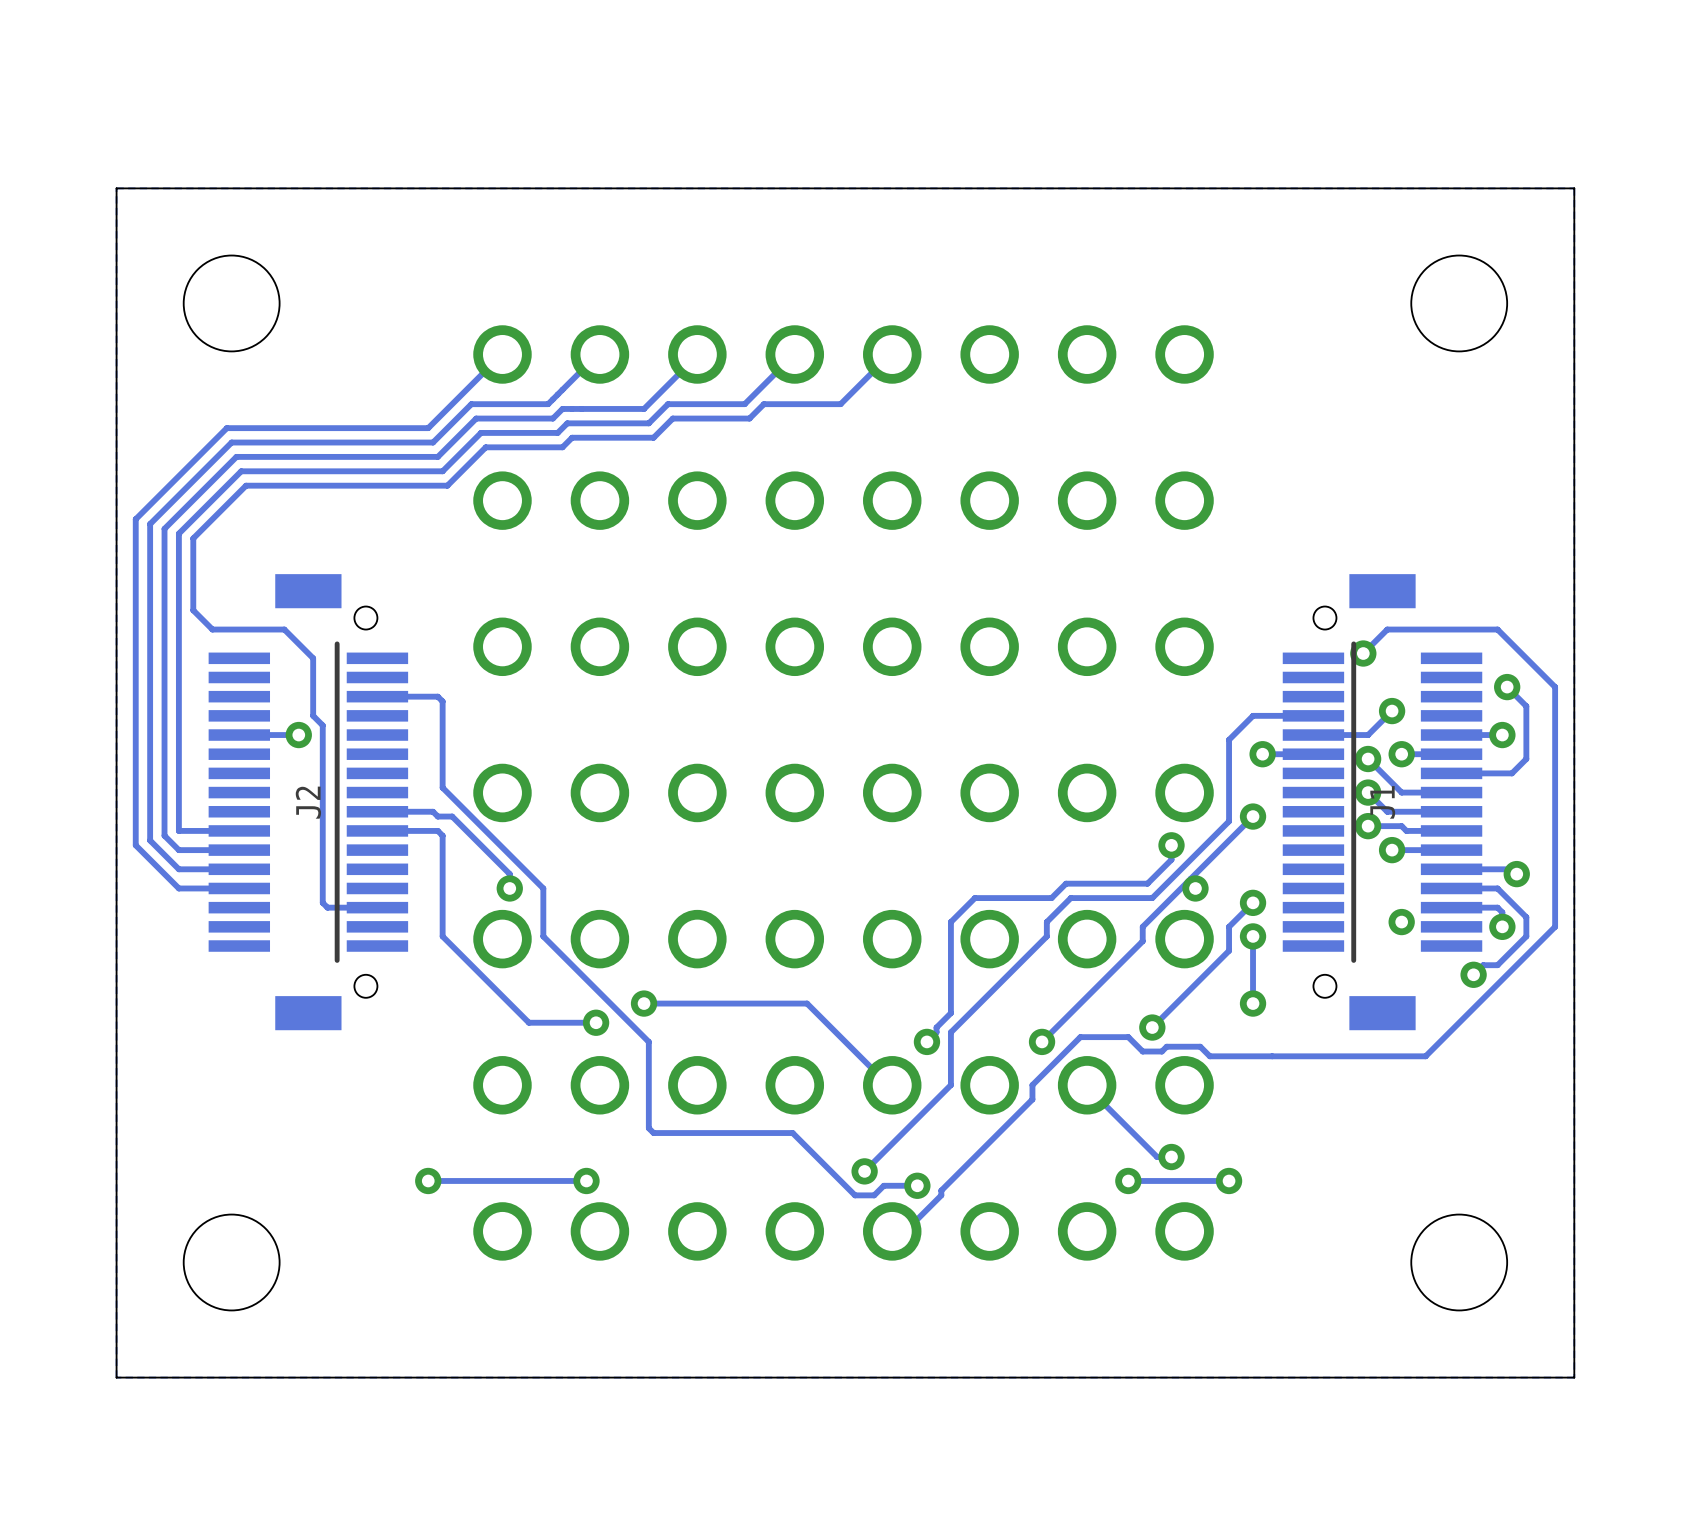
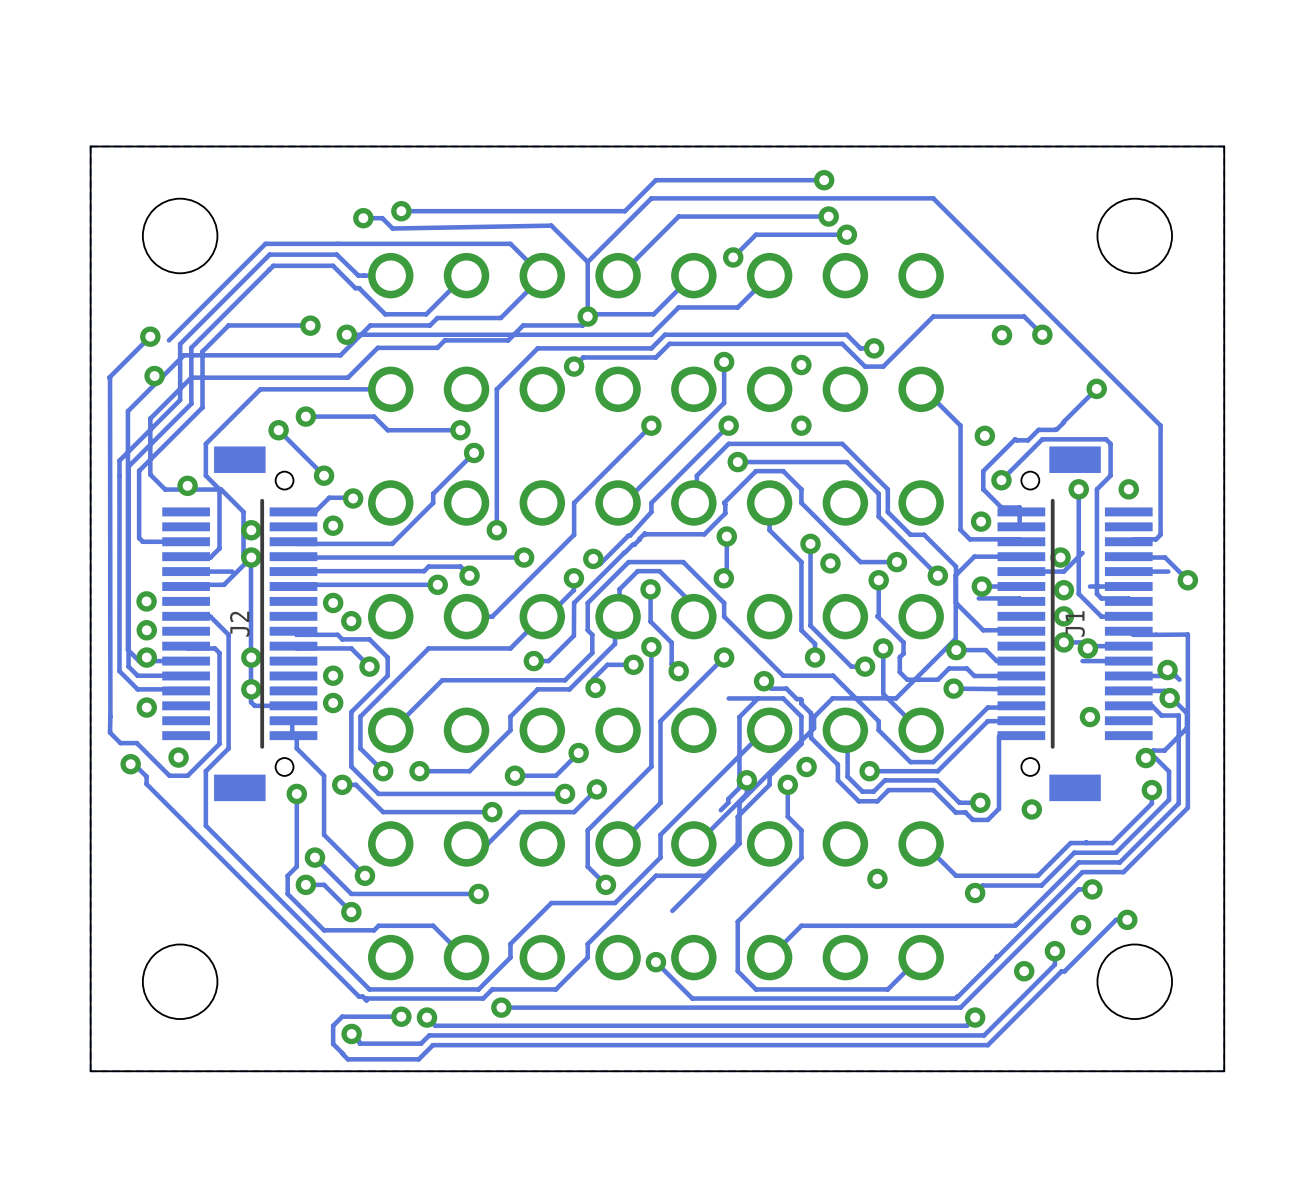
track: none -> (824, 180) (655, 180) (624, 211) (401, 211)
via: none -> (824, 180)
via: none -> (401, 211)
track: none -> (828, 216) (678, 216) (618, 275)
via: none -> (828, 216)
track: none -> (363, 218) (382, 218) (392, 228) (551, 225) (587, 262)
via: none -> (363, 218)
track: none -> (846, 234) (755, 234) (733, 257)
via: none -> (846, 234)
via: none -> (733, 257)
track: none -> (587, 262) (587, 316)
track: none -> (587, 262) (651, 198) (933, 198) (1160, 425) (1160, 534) (1156, 539) (1133, 539) (1128, 541)
track: (502, 354) (428, 428) (226, 428) -> (542, 275) (510, 243) (265, 243) (176, 332)
track: (794, 354) (744, 404) (668, 404) (648, 423) (567, 423) (557, 432) (481, 432) (442, 471) (241, 471) (178, 533) (178, 605) -> (310, 325) (228, 325) (202, 351) (202, 407) (139, 470)
track: none -> (769, 275) (737, 307) (678, 307) (651, 334) (346, 334)
track: (495, 404) (471, 404) (433, 442) (231, 442) (150, 524) (150, 840) (178, 869) (239, 869) -> (385, 314) (333, 265) (273, 265) (191, 347) (191, 403) (128, 466) (128, 666) (137, 675) (186, 675)
via: none -> (587, 316)
via: none -> (310, 325)
via: none -> (346, 334)
track: none -> (1042, 334) (1024, 316) (933, 316) (883, 366) (865, 366) (842, 343) (669, 343) (655, 357) (583, 357) (574, 366)
via: none -> (1042, 334)
via: none -> (1001, 335)
track: none -> (150, 336) (109, 377) (110, 732) (120, 743) (136, 743) (169, 775) (187, 775) (219, 743) (219, 653) (214, 648) (187, 648) (186, 646)
via: none -> (150, 336)
track: (217, 437) (135, 519) (135, 845) (178, 888) (239, 888) -> (390, 275) (358, 275) (336, 254) (269, 254) (180, 344) (180, 400) (119, 460) (119, 671) (137, 689) (186, 690)
track: none -> (874, 348) (860, 348) (846, 334) (665, 334) (651, 348) (537, 348) (496, 389) (496, 530)
via: none -> (874, 348)
track: none -> (724, 362) (724, 402) (624, 502) (618, 502)
via: none -> (724, 362)
via: none -> (801, 365)
via: none -> (574, 366)
via: none -> (154, 376)
track: none -> (390, 389) (260, 389) (205, 443) (205, 475) (219, 489) (219, 548) (210, 557) (186, 556)
track: none -> (921, 389) (924, 389) (960, 425) (960, 529) (970, 539) (1019, 539) (1021, 541)
track: none -> (1096, 388) (1057, 429) (1038, 429) (1028, 440) (1015, 439) (983, 471) (983, 489) (1001, 507) (1019, 507) (1021, 511) (1019, 512) (1019, 525) (1021, 526)
via: none -> (1096, 388)
track: none -> (305, 416) (374, 416) (387, 430) (460, 430)
via: none -> (305, 416)
track: none -> (651, 425) (574, 502) (574, 534) (492, 616) (466, 616)
via: none -> (651, 425)
track: none -> (728, 425) (651, 502) (651, 512) (630, 535) (600, 564) (589, 564) (593, 558)
via: none -> (728, 425)
via: none -> (801, 425)
track: none -> (278, 430) (324, 475)
via: none -> (278, 430)
via: none -> (460, 430)
via: none -> (984, 435)
via: none -> (474, 452)
track: none -> (737, 462) (846, 462) (878, 493) (878, 516) (937, 575)
via: none -> (737, 462)
via: none -> (324, 475)
via: none -> (1001, 480)
via: none -> (187, 485)
via: none -> (1128, 489)
track: none -> (353, 498) (329, 497) (315, 511) (293, 511)
via: none -> (353, 498)
track: none -> (693, 502) (696, 502) (696, 475) (728, 443) (842, 443) (887, 489) (887, 512) (910, 534) (924, 534) (956, 566) (956, 602) (983, 630) (1021, 631)
track: none -> (769, 502) (769, 530) (801, 562) (801, 630) (815, 643) (815, 657)
track: (1363, 653) (1387, 629) (1497, 629) (1555, 687) (1555, 926) (1425, 1056) (1209, 1056) (1200, 1046) (1166, 1046) (1161, 1051) (1142, 1051) (1128, 1037) (1080, 1037) (1032, 1085) (1032, 1099) (941, 1190) (941, 1195) (907, 1228) (893, 1228) (892, 1231) -> none
via position: (1363, 653) -> (1078, 489)
via: none -> (981, 521)
via: none -> (333, 525)
via: none -> (251, 530)
via: none -> (496, 530)
track: (1507, 687) (1526, 706) (1526, 759) (1511, 773) (1451, 773) -> (1001, 480) (1042, 439) (1106, 439) (1110, 443) (1110, 475) (1096, 489) (1096, 593) (1101, 598) (1128, 598) (1128, 601)
via: (1507, 687) -> none
track: none -> (726, 536) (726, 582)
via: none -> (726, 536)
track: (178, 691) (178, 830) (239, 830) -> (139, 538) (142, 541) (186, 541)
track: (377, 696) (437, 696) (442, 701) (442, 787) (543, 888) (543, 936) (648, 1041) (648, 1128) (653, 1133) (792, 1133) (855, 1195) (874, 1195) (883, 1185) (917, 1185) -> (293, 541) (296, 543) (392, 543) (433, 502) (433, 493) (474, 452)
track: none -> (810, 543) (810, 625) (851, 666) (865, 666)
via: none -> (810, 543)
via: (1392, 711) -> none
track: none -> (293, 556) (524, 557)
track: none -> (1128, 556) (1165, 557) (1187, 580)
track: none -> (251, 557) (224, 584) (187, 584) (186, 586)
via: none -> (524, 557)
via: none -> (1060, 557)
via: none -> (593, 558)
track: none -> (896, 562) (860, 562) (801, 502) (801, 489) (783, 471) (755, 471) (724, 502) (725, 513) (704, 534) (644, 533) (574, 602) (573, 635) (548, 661) (533, 661)
via: none -> (896, 562)
via: none -> (830, 563)
via position: (298, 735) -> (251, 557)
track: none -> (293, 571) (424, 571) (428, 566) (460, 566) (469, 575)
via position: (1502, 735) -> (1187, 580)
via: none -> (469, 575)
via: none -> (937, 575)
track: none -> (573, 578) (573, 590) (548, 615) (542, 616) (510, 648) (428, 648) (360, 716) (360, 748) (383, 771)
via: none -> (573, 578)
via: none -> (723, 578)
track: none -> (878, 580) (878, 616)
via: none -> (878, 580)
track: none -> (437, 584) (296, 584) (293, 586)
via: none -> (437, 584)
via: (1401, 754) -> none
track: none -> (650, 589) (650, 621) (671, 642) (671, 664) (678, 671)
via: none -> (650, 589)
track: (1368, 759) (1401, 792) (1451, 792) -> (1078, 489) (1078, 593) (1101, 616) (1128, 616)
track: none -> (978, 598) (1019, 598) (1021, 601)
via: none -> (146, 601)
via: none -> (333, 602)
track: none -> (186, 616) (210, 616) (228, 634) (228, 748) (205, 771) (205, 825) (369, 989) (478, 989) (510, 957) (510, 943) (551, 903) (615, 903) (660, 857) (660, 834) (765, 730) (769, 730)
track: none -> (693, 616) (692, 616) (692, 603) (659, 571) (637, 571) (619, 589) (619, 616) (615, 616) (615, 643) (569, 689) (537, 689) (510, 716) (510, 730) (469, 771) (419, 771)
track: none -> (878, 616) (903, 642) (903, 653) (899, 657) (899, 672) (907, 679) (937, 679) (949, 668) (966, 668) (974, 675) (1021, 675) (1019, 675)
track: (1368, 792) (1387, 811) (1451, 811) -> (655, 962) (692, 998) (956, 998) (1082, 872) (1123, 872) (1187, 807) (1187, 634) (1133, 634) (1128, 631)
via: none -> (351, 621)
via: none -> (146, 630)
track: (377, 811) (433, 811) (437, 816) (452, 816) (509, 874) (509, 888) -> (293, 631) (296, 634) (337, 634) (342, 639) (369, 639) (387, 657) (387, 675) (351, 712) (351, 766) (378, 793) (565, 793)
track: (1253, 816) (1142, 926) (1142, 941) (1042, 1041) -> none
via position: (1253, 816) -> (956, 650)
track: (377, 830) (437, 830) (442, 835) (442, 936) (528, 1022) (596, 1022) -> (293, 646) (296, 648) (351, 648) (369, 666)
track: none -> (651, 647) (651, 766) (587, 830) (587, 866) (605, 884)
via: none -> (651, 647)
track: none -> (883, 648) (883, 693) (921, 730)
via: none -> (883, 648)
track: none -> (956, 650) (985, 650) (996, 661) (1023, 661) (1021, 661)
via: none -> (146, 657)
via: none -> (251, 657)
track: none -> (724, 657) (660, 721) (660, 803) (618, 843)
via: none -> (724, 657)
via: none -> (815, 657)
track: (1171, 845) (1171, 859) (1147, 883) (1066, 883) (1051, 898) (1007, 898) -> (364, 998) (483, 998) (492, 989) (555, 989) (587, 957) (587, 943) (655, 875) (705, 875) (737, 843) (737, 816) (769, 784) (769, 775) (801, 743) (801, 716) (783, 698)
via: (1171, 845) -> none
via: none -> (533, 661)
via position: (1392, 850) -> (1087, 648)
track: none -> (633, 664) (607, 664) (593, 678) (593, 693)
via: none -> (633, 664)
via: none -> (369, 666)
via: none -> (865, 666)
via: none -> (1167, 670)
via: none -> (678, 671)
via: none -> (333, 675)
via: (1516, 874) -> none
track: none -> (764, 681) (771, 688) (786, 688) (796, 699) (801, 699) (801, 703) (811, 713) (811, 737) (837, 764) (837, 780) (858, 801) (877, 801) (888, 790) (933, 790) (955, 812) (965, 812) (972, 819) (987, 819) (999, 808) (999, 736) (1021, 735)
via: none -> (764, 681)
via: none -> (595, 687)
track: none -> (953, 688) (1021, 690)
via: none -> (953, 688)
via: none -> (251, 689)
via: (509, 888) -> none
via: (1195, 888) -> none
via: none -> (1169, 698)
track: (1253, 902) (1229, 926) (1229, 950) (1152, 1027) -> none
via: (1253, 902) -> none
via: none -> (333, 703)
track: none -> (1021, 705) (1019, 707) (987, 707) (933, 762) (910, 762) (878, 730) (878, 721) (833, 675) (783, 675) (724, 616) (724, 602) (683, 562) (628, 562) (587, 602) (587, 630) (592, 634) (592, 653) (565, 680) (442, 680) (390, 730)
track: (1481, 907) (1497, 907) (1502, 912) (1502, 926) -> (1151, 705) (1161, 715) (1178, 715) (1178, 803) (1119, 862) (1078, 862) (1015, 925) (801, 925) (769, 957)
via: none -> (146, 707)
track: none -> (293, 720) (292, 734) (296, 739) (296, 748) (324, 775) (324, 834) (364, 875)
track: none -> (1021, 720) (987, 721) (937, 771) (869, 771)
via: (1502, 926) -> none
track: (1253, 936) (1253, 1003) -> none
via: (1253, 936) -> none
track: none -> (845, 730) (847, 731) (847, 776) (862, 791) (873, 791) (884, 780) (937, 780) (959, 802) (980, 802)
track: none -> (578, 753) (555, 775) (515, 775)
via: none -> (578, 753)
via: none -> (178, 757)
track: none -> (1155, 758) (1169, 771) (1169, 799) (1116, 852) (1074, 852) (1041, 885) (982, 885) (975, 893)
track: none -> (130, 764) (135, 765) (146, 776) (146, 784) (359, 996) (362, 996) (366, 1000) (366, 998)
via: none -> (130, 764)
via: none -> (806, 766)
via: none -> (383, 771)
via: none -> (419, 771)
via: none -> (869, 771)
track: (644, 1003) (807, 1003) (888, 1085) (892, 1085) -> (746, 780) (746, 793) (696, 843) (693, 843)
via position: (644, 1003) -> (515, 775)
via: none -> (746, 780)
via position: (1253, 1003) -> (980, 802)
track: none -> (342, 784) (355, 784) (383, 812) (492, 812)
via: none -> (342, 784)
track: none -> (787, 784) (787, 816) (801, 830) (801, 857) (737, 921) (737, 971) (755, 989) (887, 989) (921, 957)
via: none -> (787, 784)
track: none -> (596, 789) (574, 812) (519, 812) (487, 843) (466, 843)
via: none -> (596, 789)
track: none -> (1151, 790) (1151, 803) (1112, 843) (1070, 843) (1037, 875) (956, 875) (924, 843) (921, 843)
via: none -> (1151, 790)
track: none -> (296, 793) (296, 866) (287, 875) (287, 893) (324, 930) (374, 930) (378, 925) (433, 925) (466, 957)
via: none -> (296, 793)
via: none -> (565, 793)
via: (596, 1022) -> none
via: (1152, 1027) -> none
via: none -> (1031, 809)
via: (926, 1041) -> none
via: (1042, 1041) -> none
via: none -> (492, 812)
track: (1087, 1085) (1157, 1157) (1171, 1157) -> none
track: none -> (314, 857) (351, 893) (478, 893)
via: none -> (314, 857)
via: none -> (364, 875)
via: none -> (877, 878)
track: none -> (305, 884) (324, 884) (351, 912)
via: none -> (305, 884)
via: none -> (605, 884)
track: none -> (1092, 889) (1078, 889) (960, 1007) (501, 1007)
via: none -> (1092, 889)
via: (1171, 1157) -> none
via: (864, 1171) -> none
via position: (428, 1180) -> (351, 912)
track: (586, 1180) (428, 1180) -> none
via position: (586, 1180) -> (478, 893)
via: (1128, 1180) -> none
track: (1229, 1180) (1128, 1180) -> none
via position: (1229, 1180) -> (975, 893)
track: none -> (1127, 919) (1116, 919) (987, 1045) (432, 1045) (418, 1059) (347, 1059) (333, 1043) (333, 1025) (342, 1016) (401, 1016)
via: none -> (1127, 919)
via: (917, 1185) -> none
via: none -> (1081, 925)
track: none -> (1054, 951) (1054, 964) (984, 1035) (429, 1035) (421, 1043) (359, 1043) (351, 1033)
via: none -> (1054, 951)
via: none -> (655, 962)
via: none -> (1024, 971)
via: none -> (501, 1007)
via: none -> (401, 1016)
via: none -> (426, 1017)
track: none -> (975, 1017) (966, 1025) (435, 1025) (426, 1017)
via: none -> (975, 1017)
via: none -> (351, 1033)

